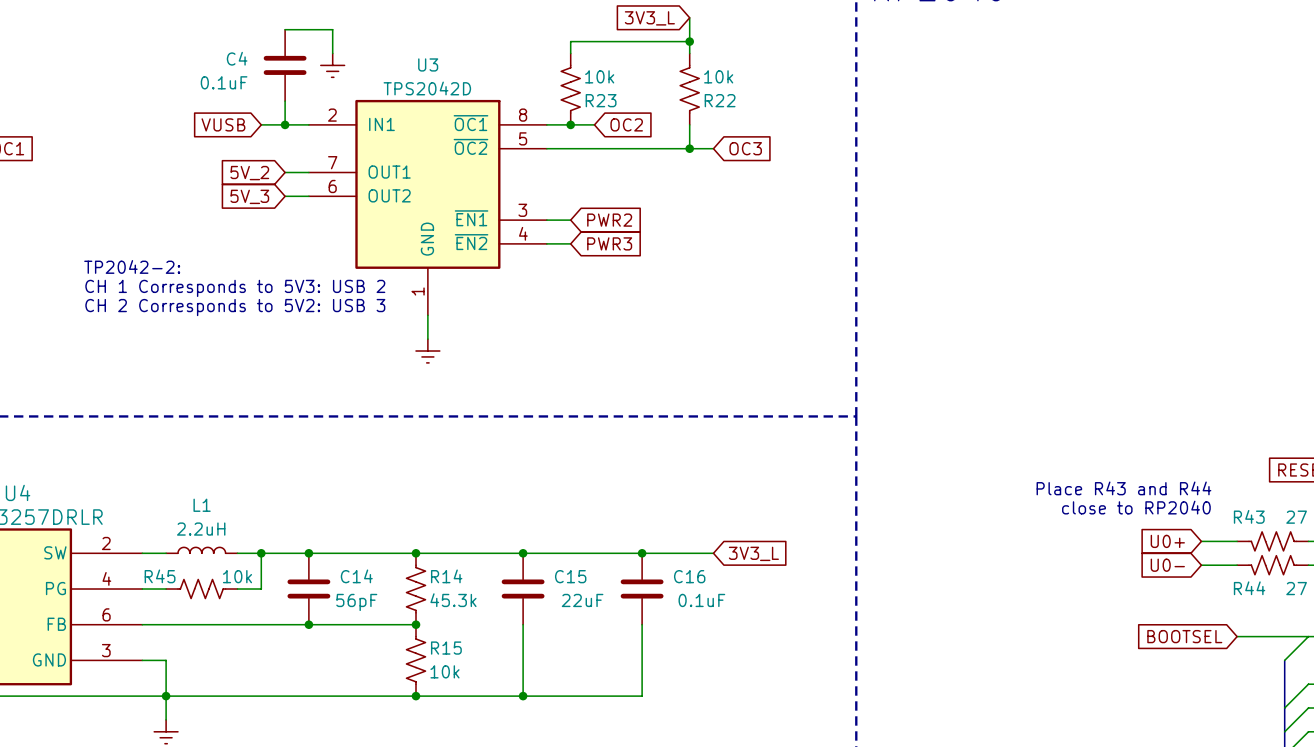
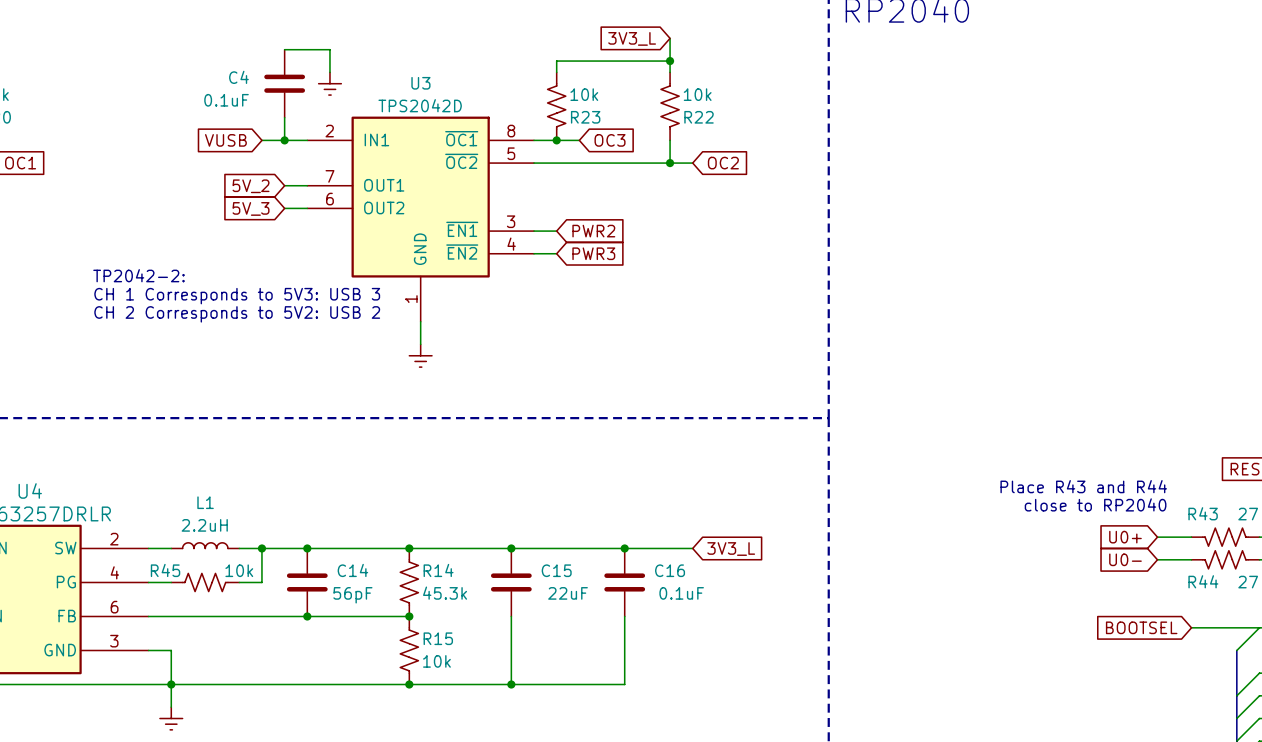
global label: OC2 (626, 124) -> OC3 (610, 140)
global label: OC3 (745, 148) -> OC2 (723, 163)
text: CH 1 Corresponds to 5V3: USB 2 (235, 288) -> CH 1 Corresponds to 5V3: USB 3 (237, 296)
text: CH 2 Corresponds to 5V2: USB 3 (235, 307) -> CH 2 Corresponds to 5V2: USB 2 (237, 314)

